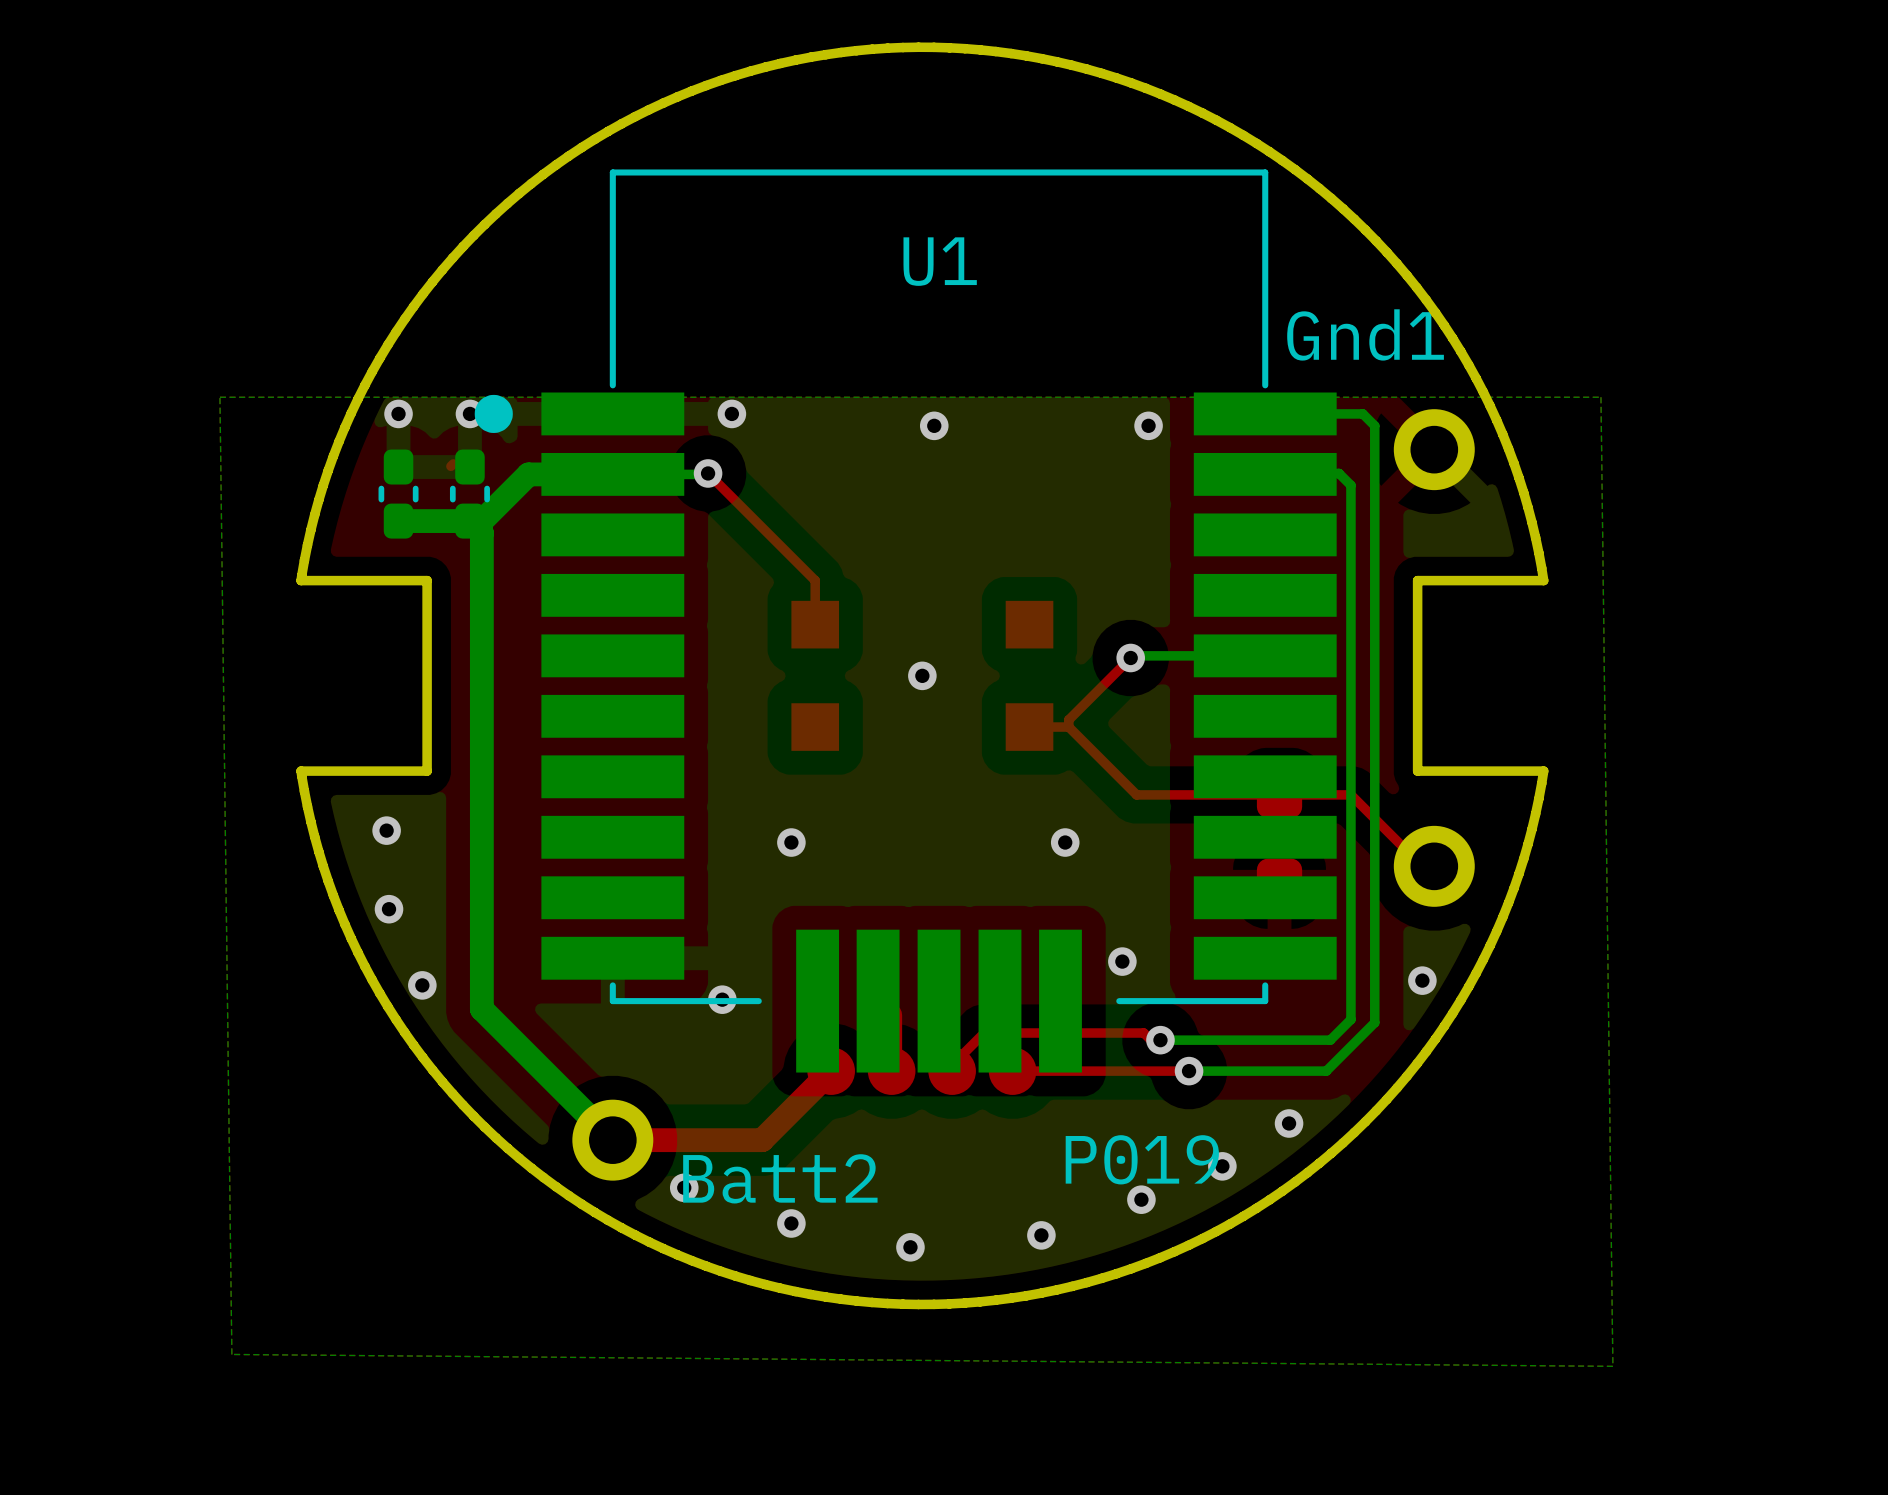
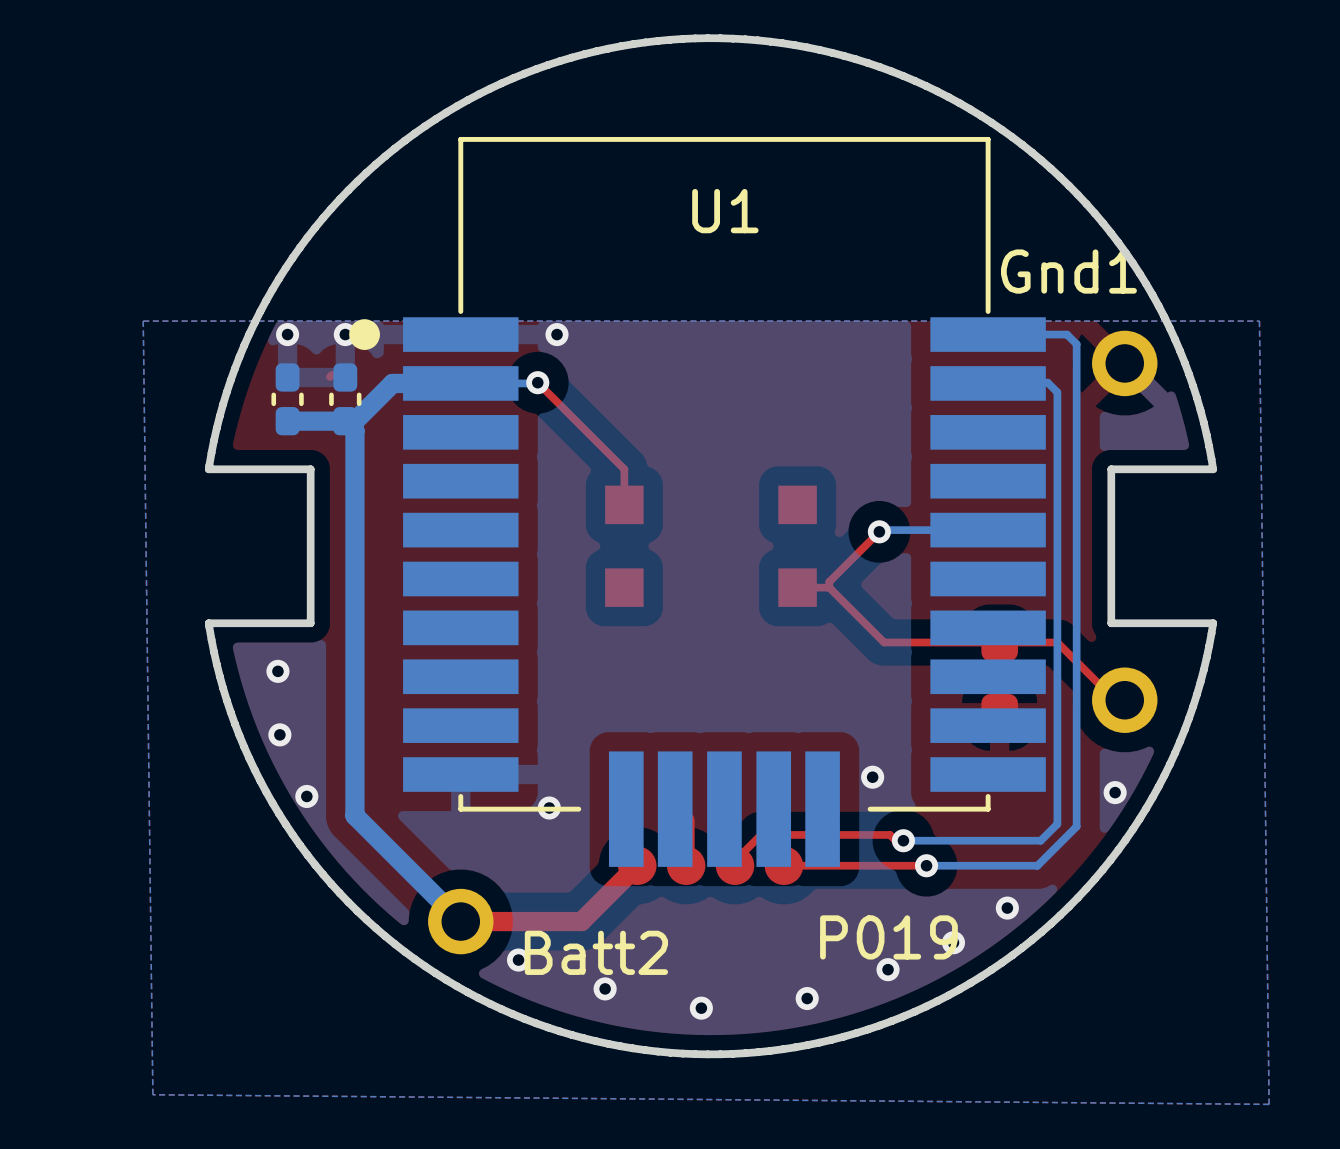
via: (934, 425) -> none
via: (1148, 425) -> none
via: (922, 675) -> none
via: (791, 842) -> none
via: (1065, 842) -> none

